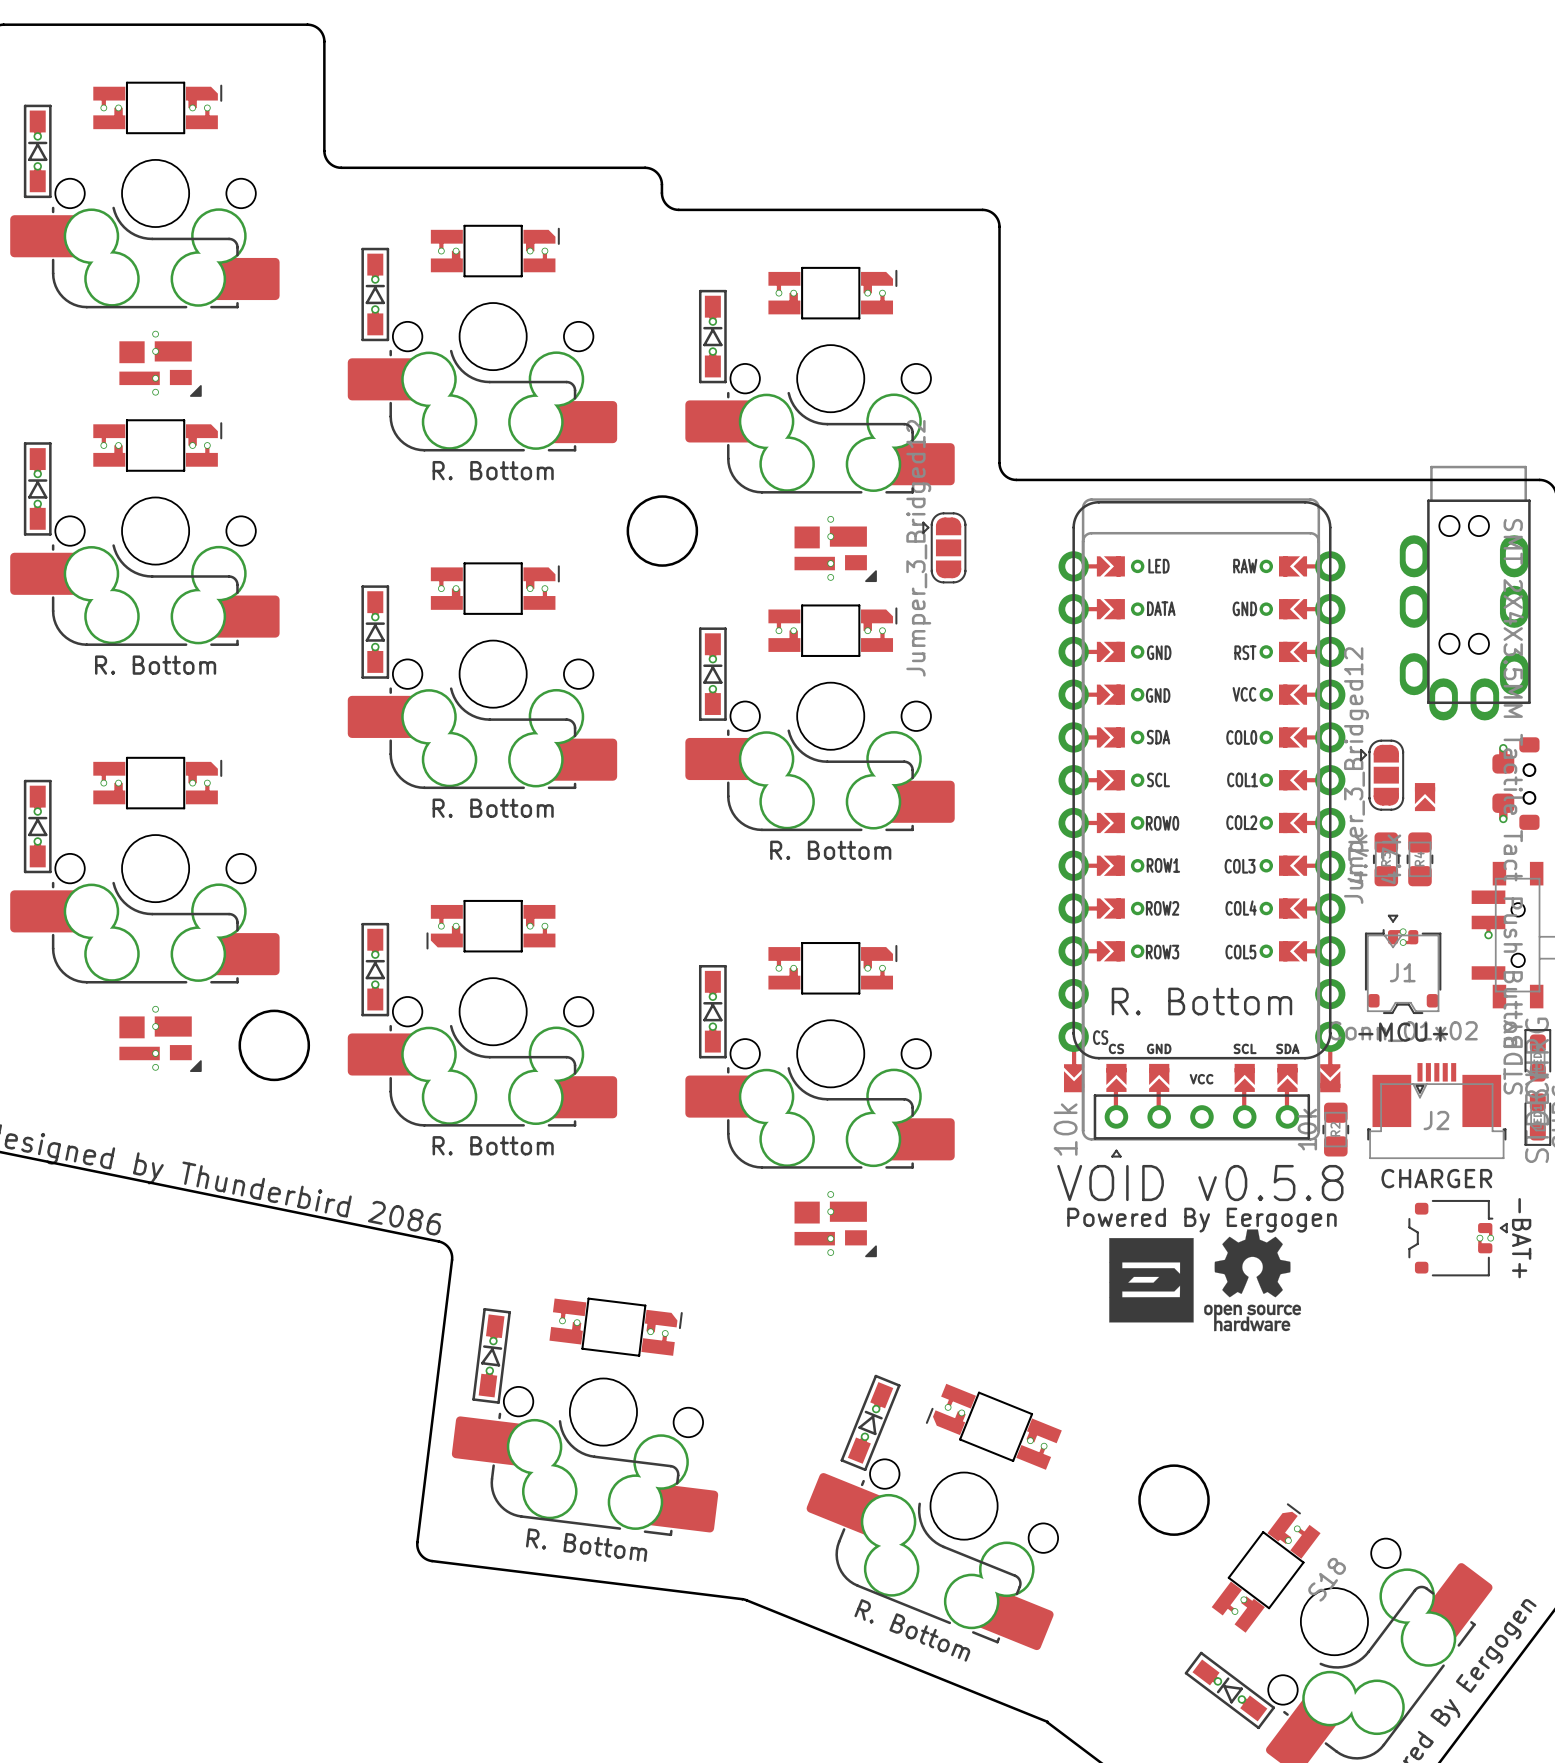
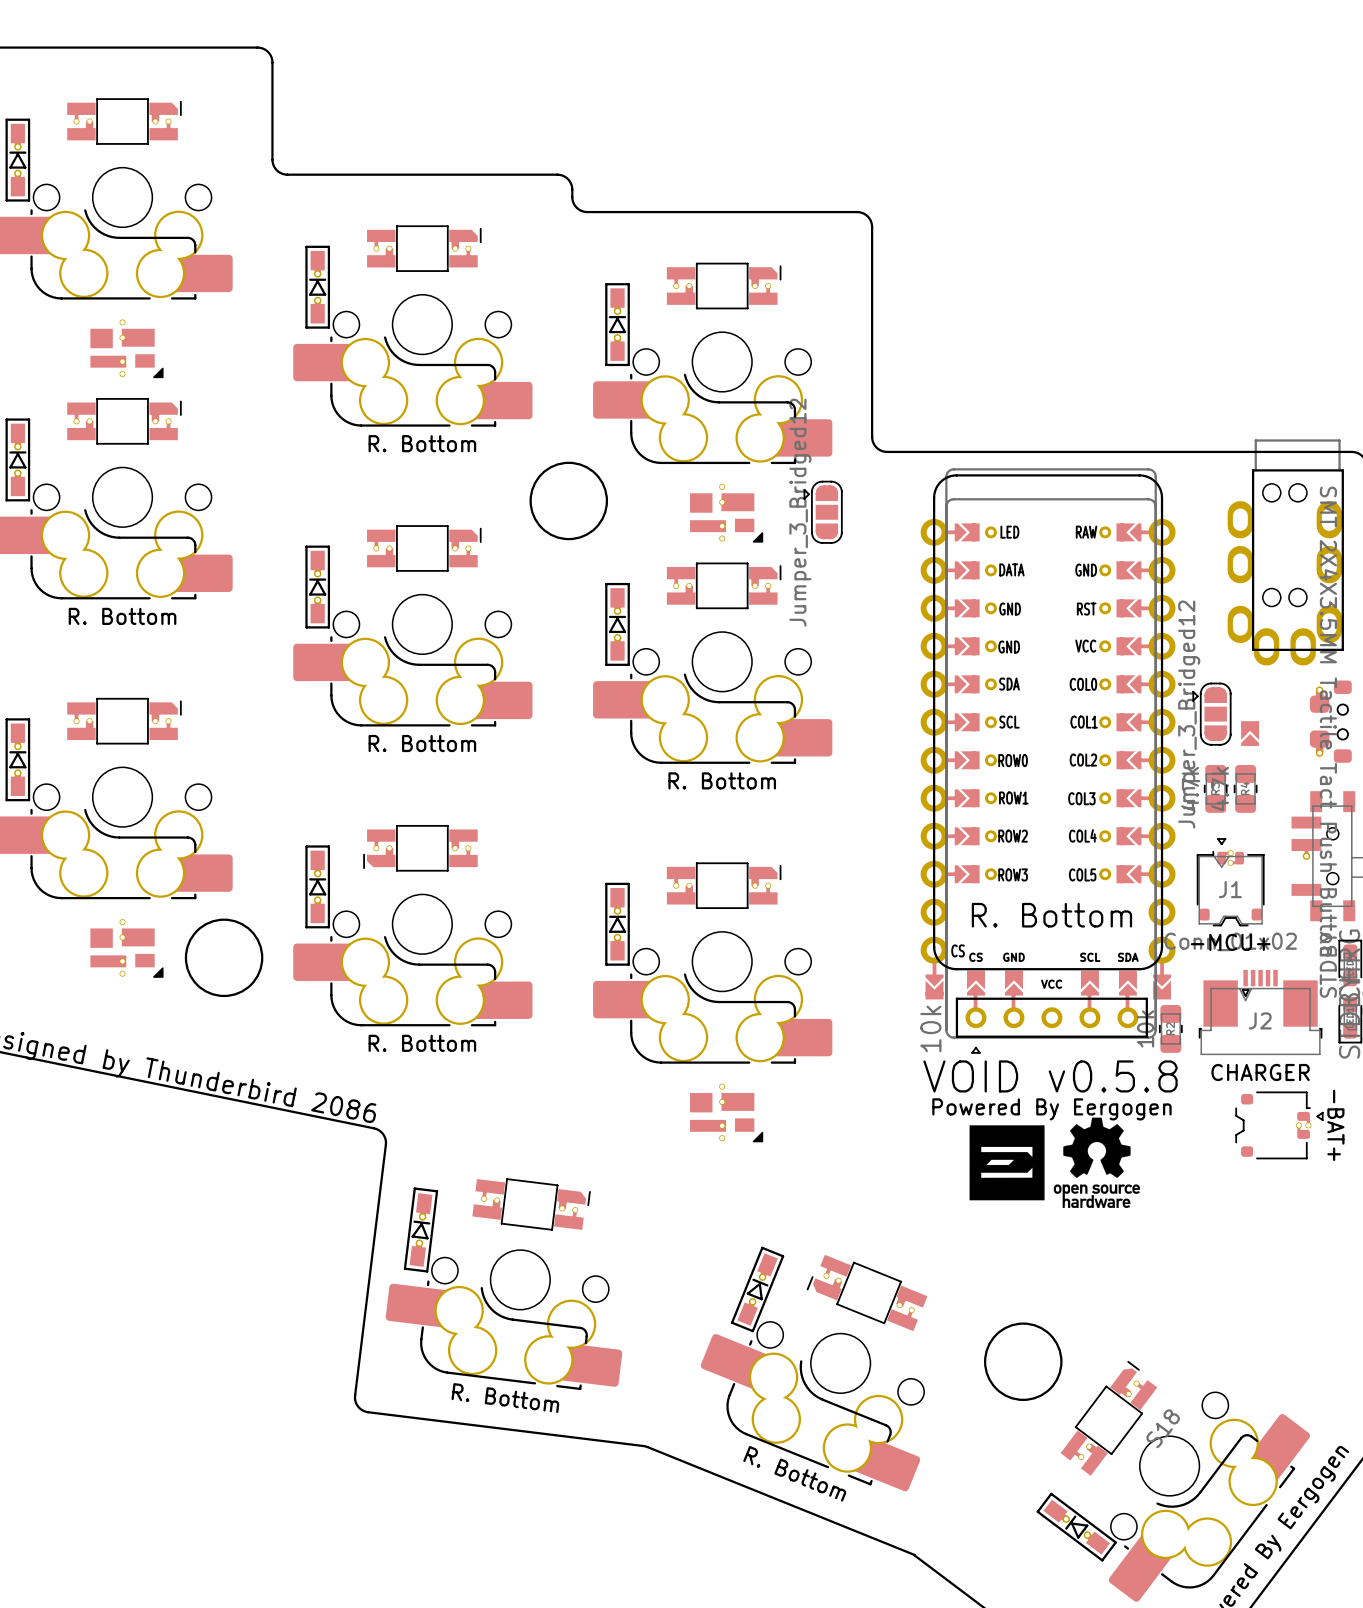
round board edge size: [626, 495, 699, 567] -> [529, 461, 609, 541]
part footprint: [1058, 500, 1346, 1093] -> [920, 474, 1176, 1000]
round board edge size: [238, 1009, 311, 1082] -> [184, 918, 264, 998]
round board edge size: [1138, 1464, 1210, 1536] -> [984, 1322, 1063, 1402]

